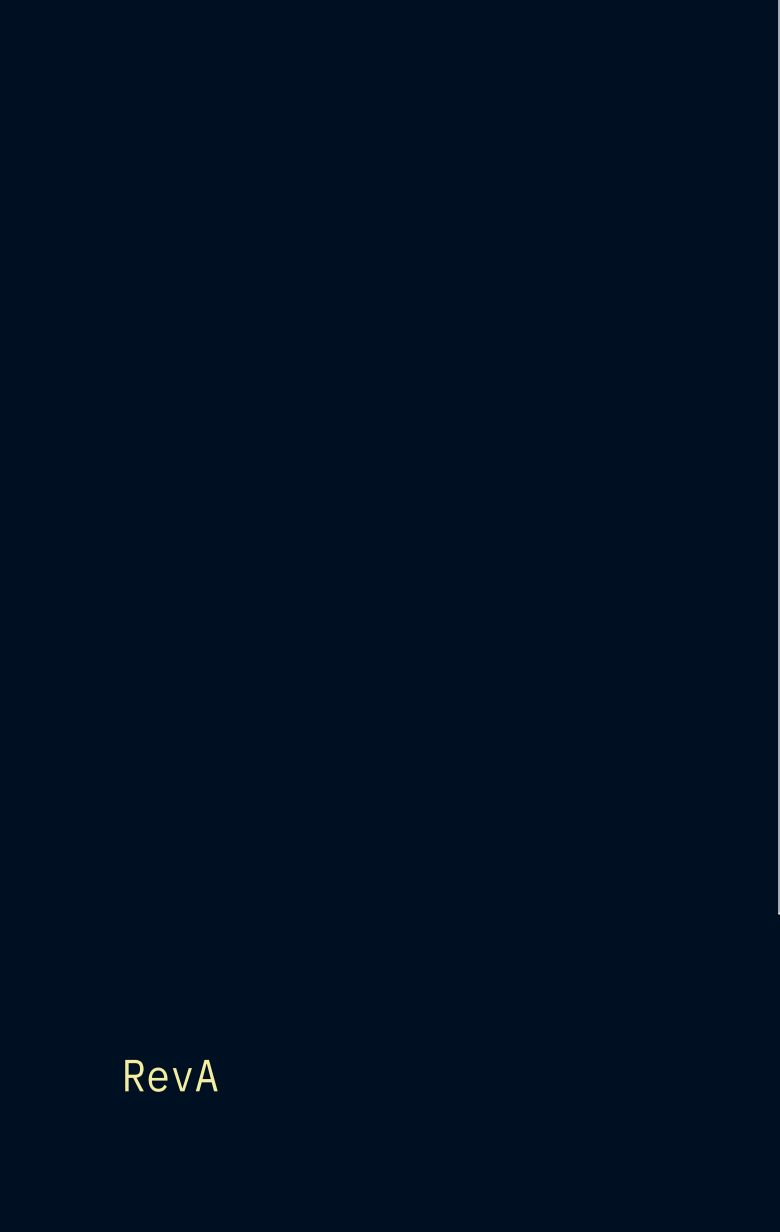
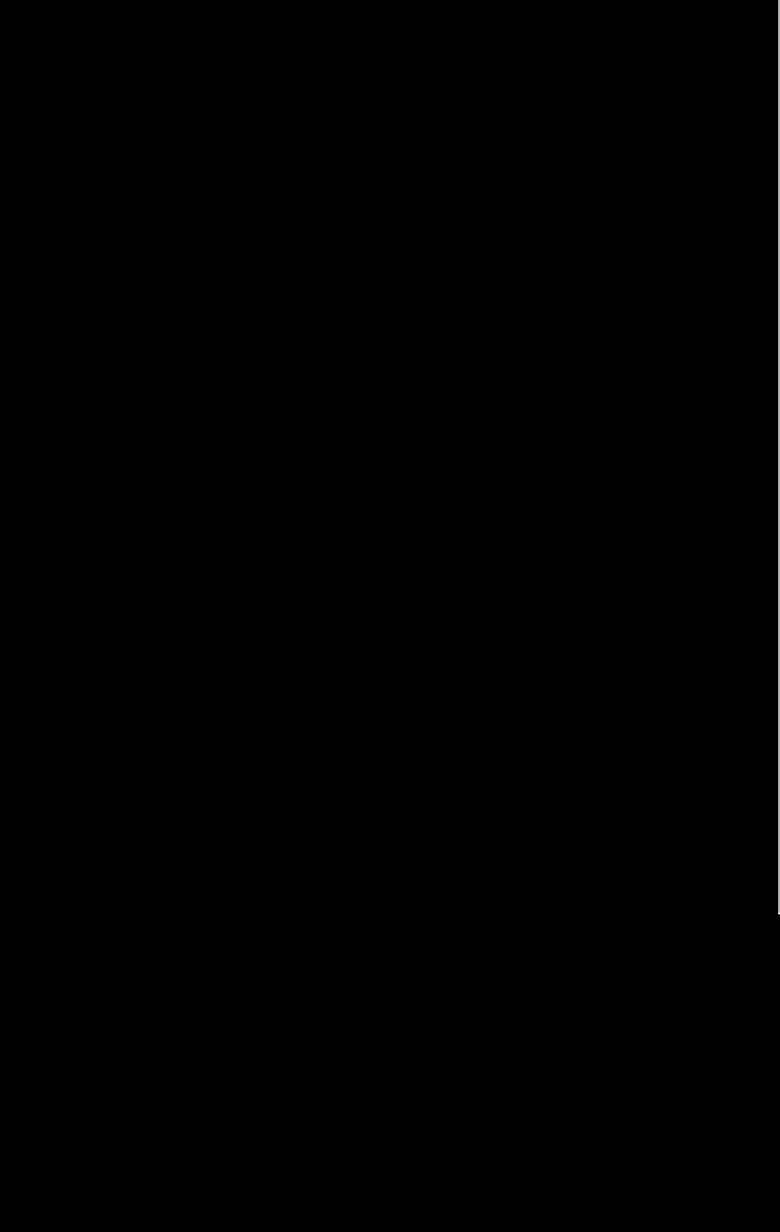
drawing: [125, 1059, 218, 1092] -> none

